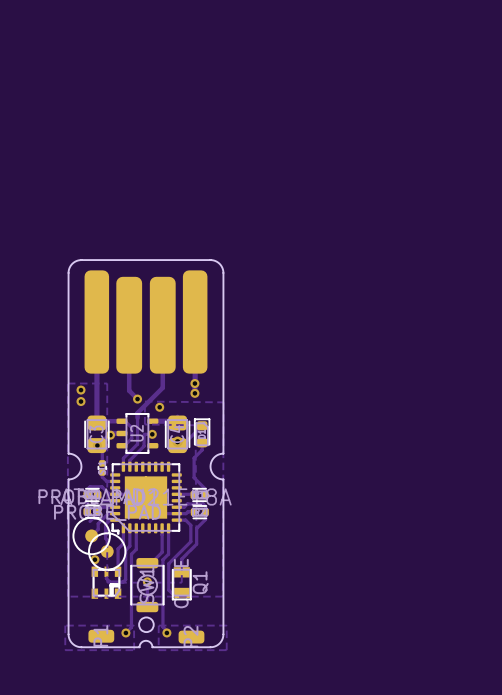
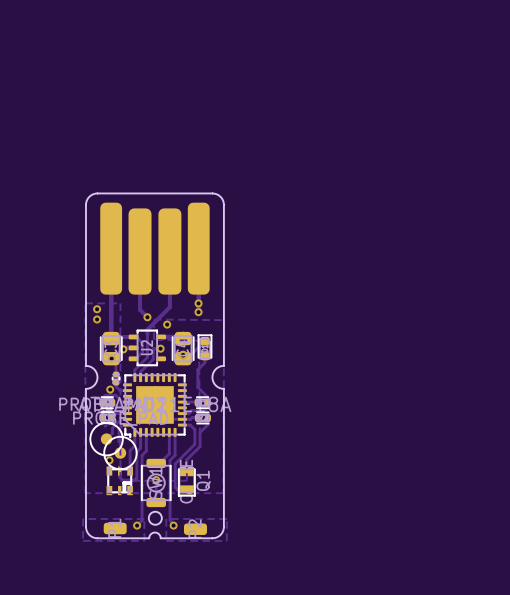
via: none -> (110, 389)

